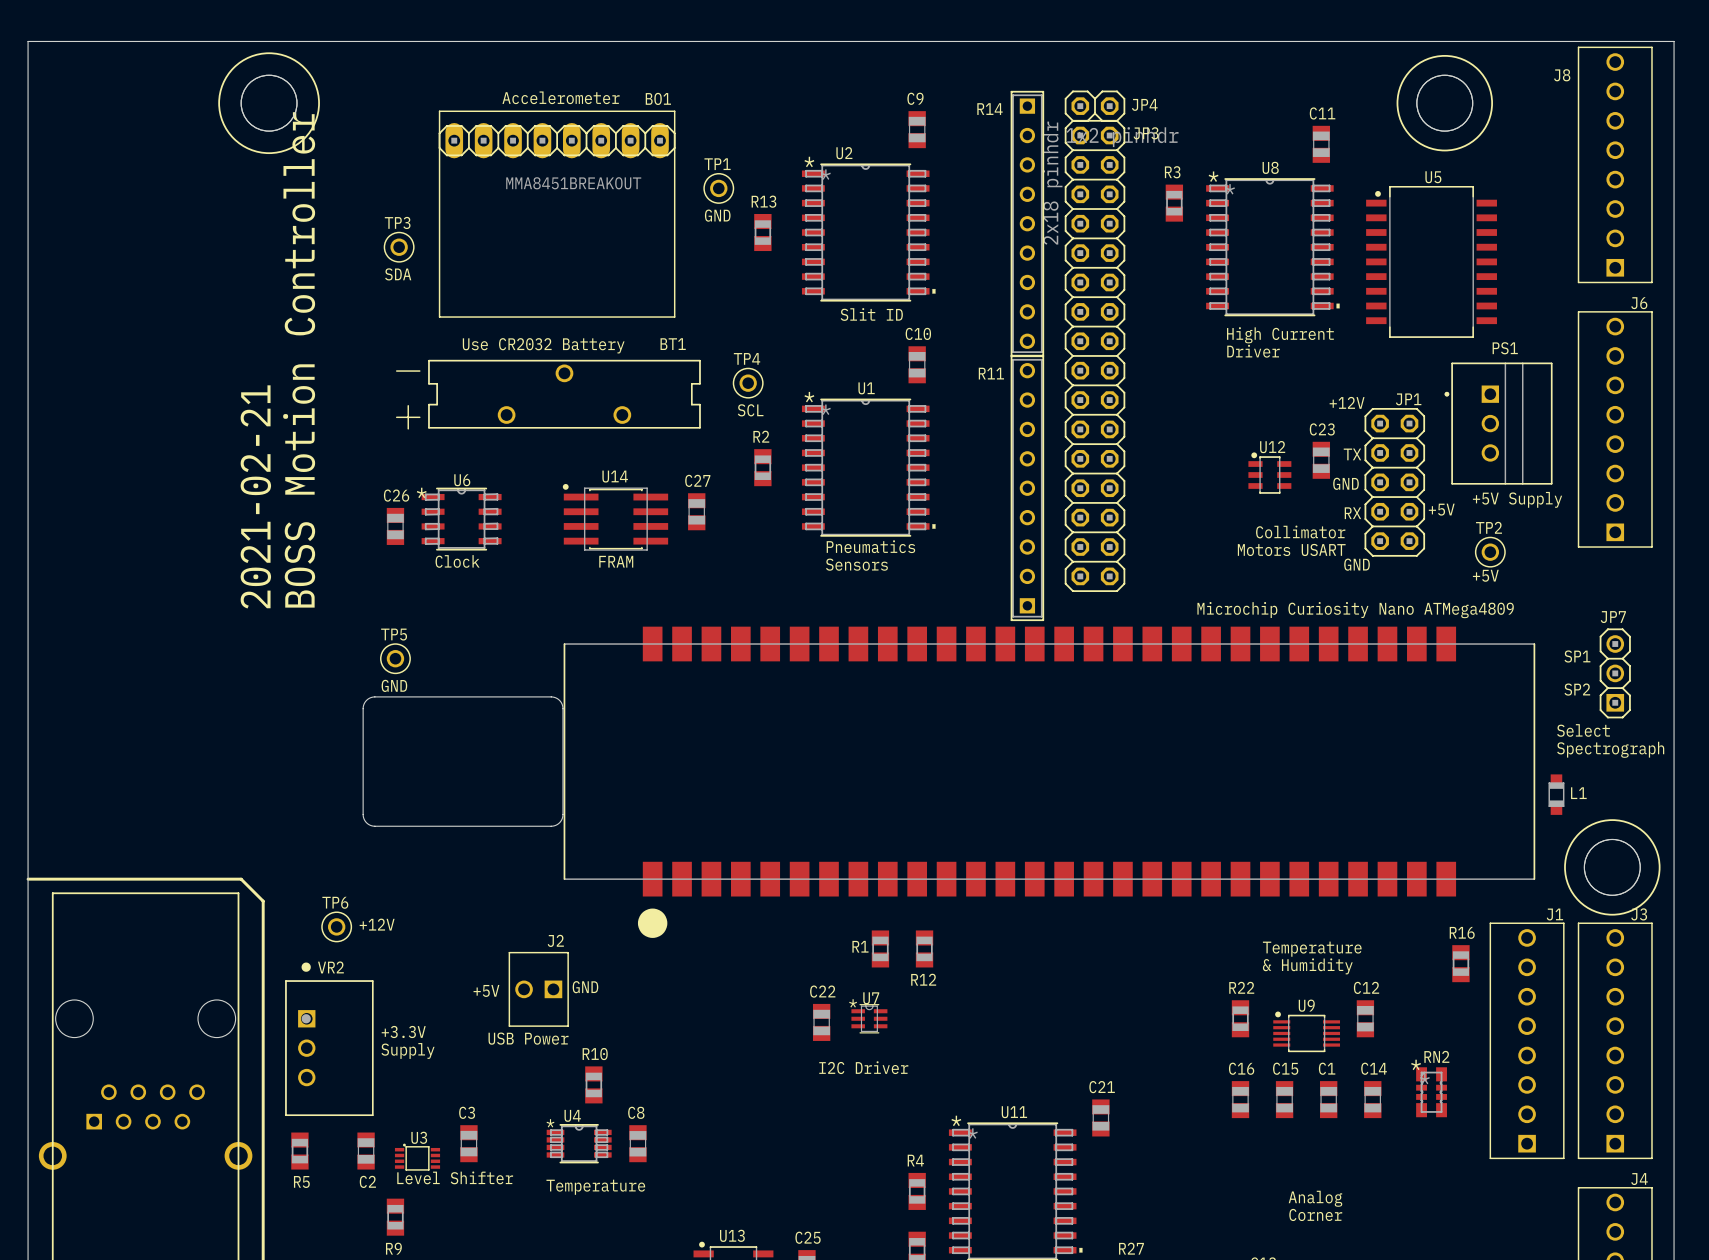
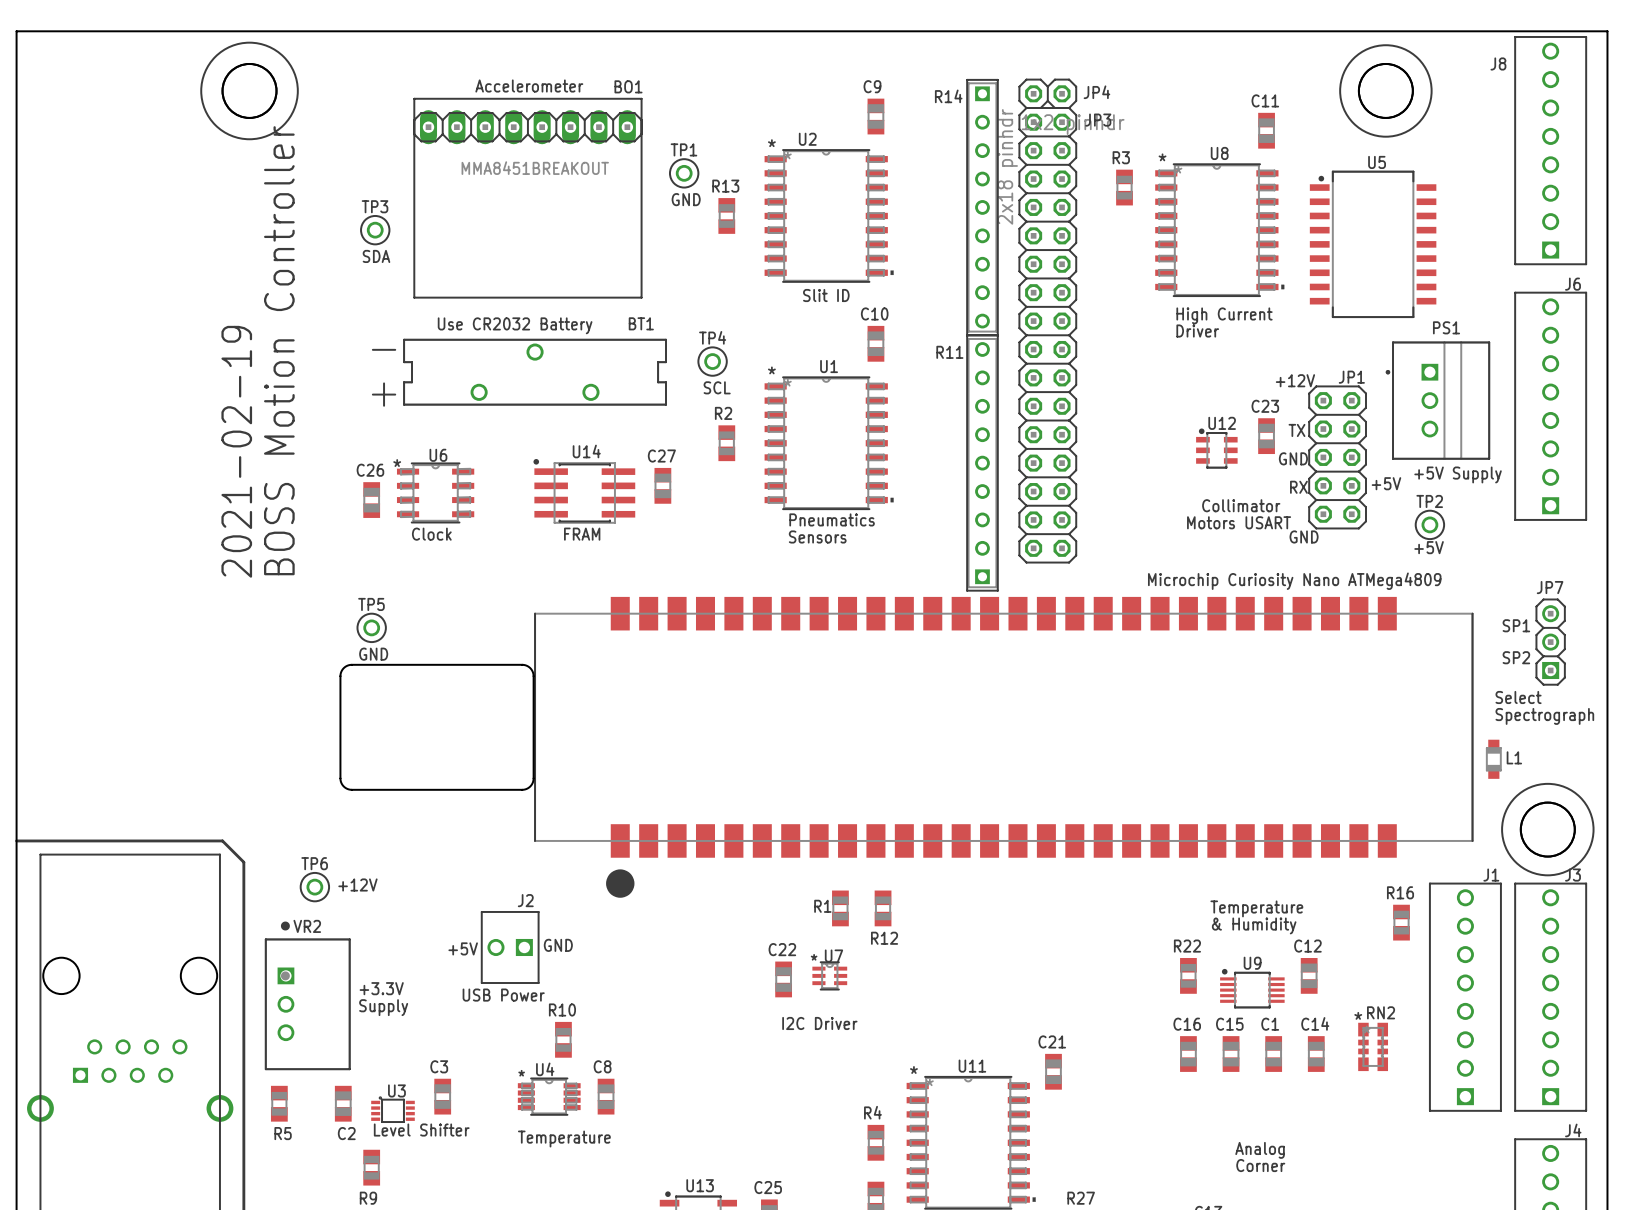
text: 2021-02-21 (255, 496) -> 2021-02-19 (236, 451)

